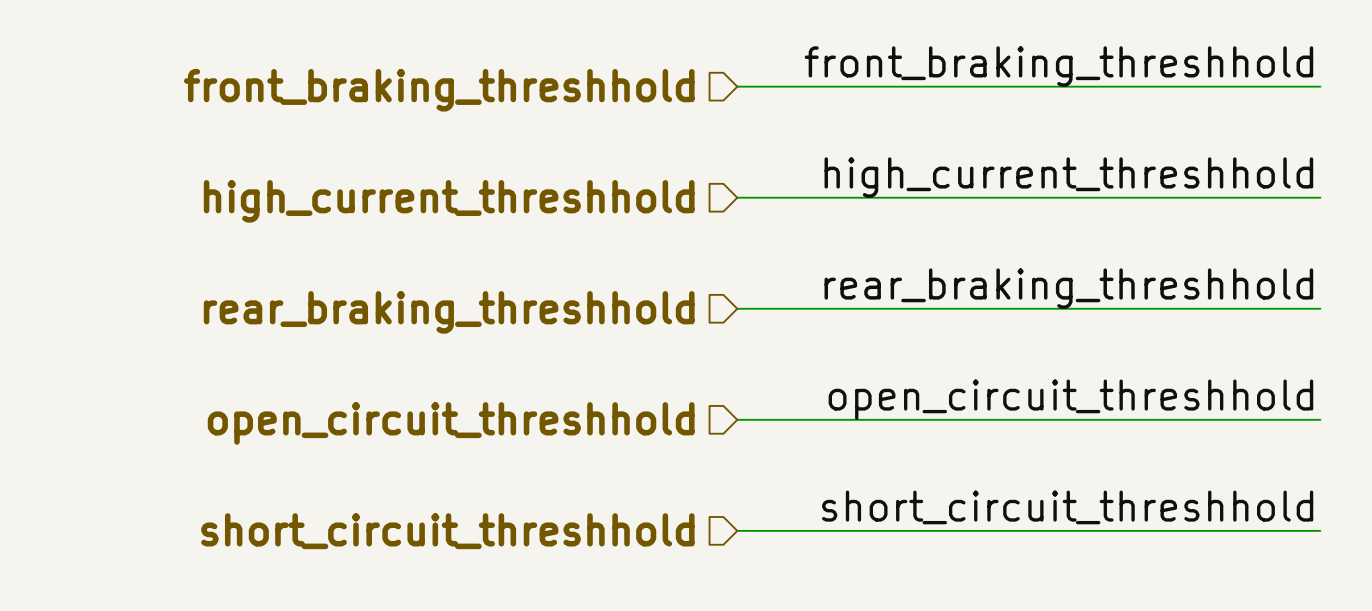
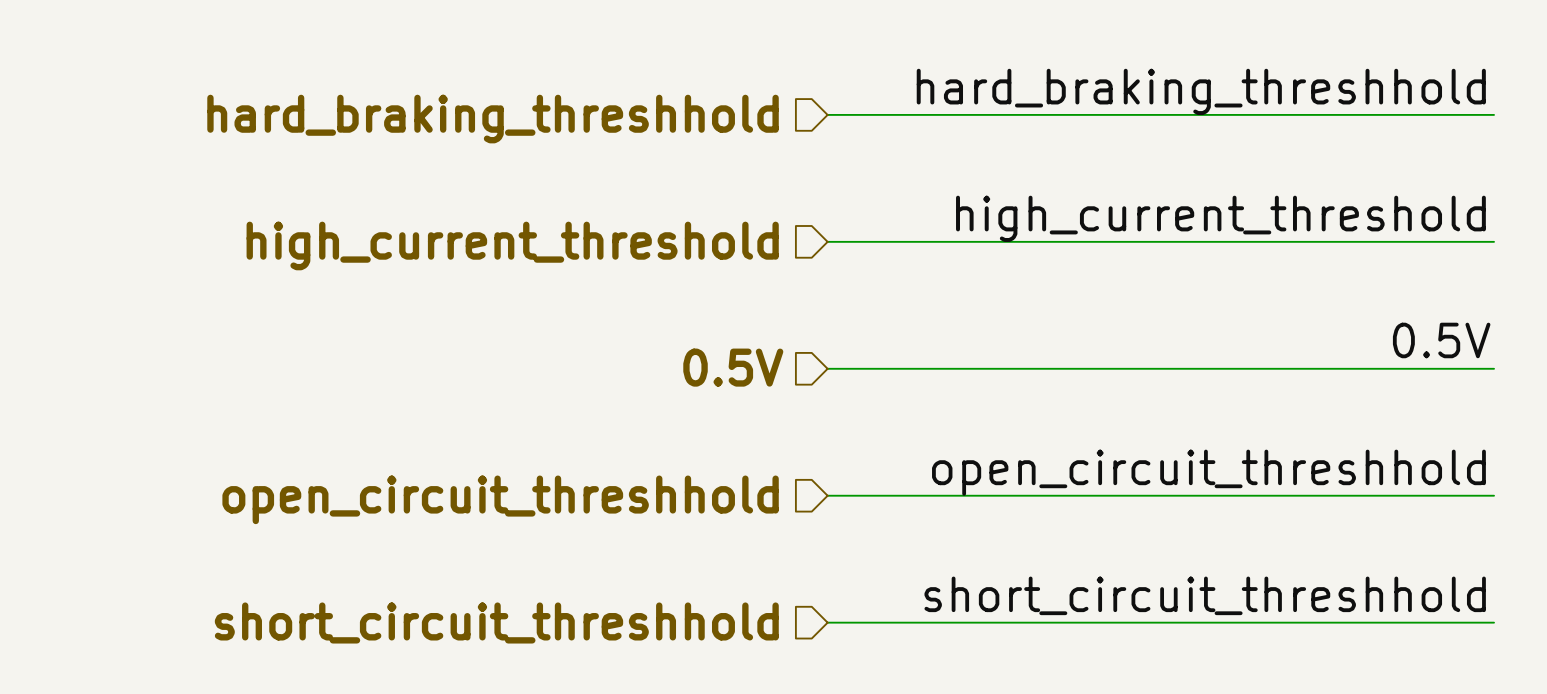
label: front_braking_threshhold (1058, 66) -> hard_braking_threshhold (1201, 91)
hierarchical label: front_braking_threshhold (439, 90) -> hard_braking_threshhold (493, 119)
label: high_current_threshhold (1068, 177) -> high_current_threshold (1220, 218)
hierarchical label: high_current_threshhold (449, 201) -> high_current_threshold (512, 245)
label: rear_braking_threshhold (1068, 288) -> 0.5V (1441, 340)
hierarchical label: rear_braking_threshhold (449, 312) -> 0.5V (733, 367)

